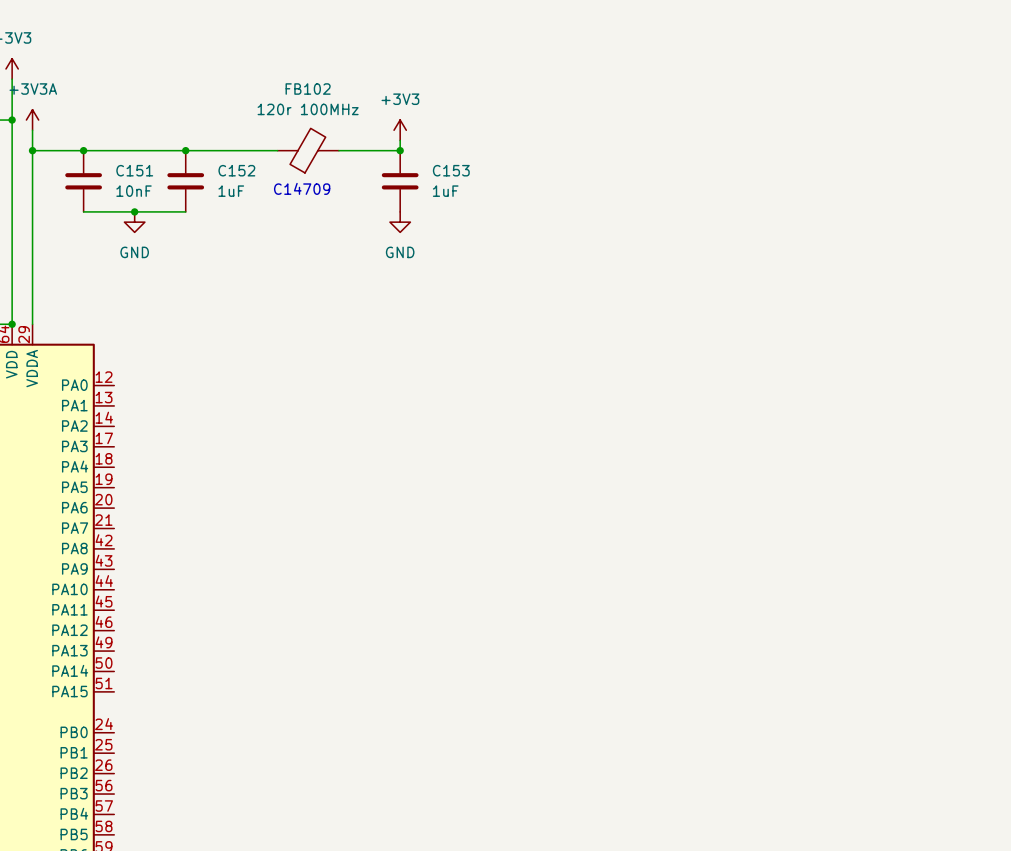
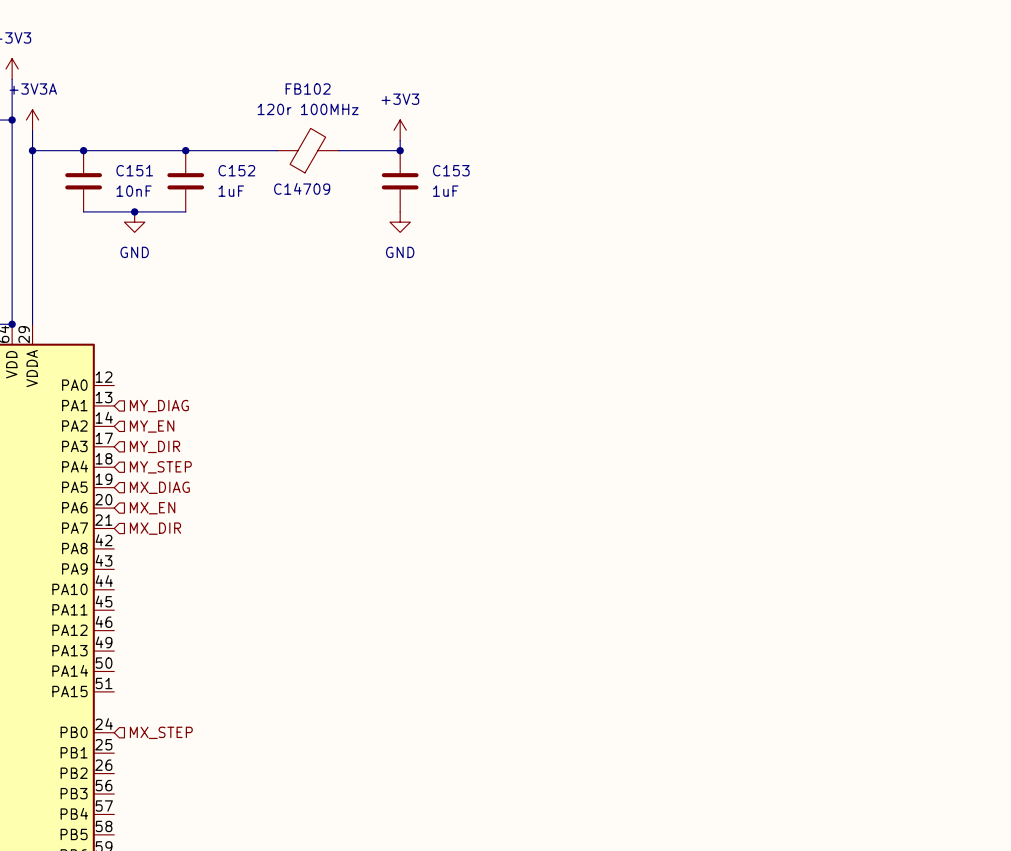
hierarchical label: none -> MY_DIAG (159, 406)
hierarchical label: none -> MY_EN (152, 426)
hierarchical label: none -> MY_DIR (155, 446)
hierarchical label: none -> MY_STEP (160, 467)
hierarchical label: none -> MX_DIAG (159, 487)
hierarchical label: none -> MX_EN (152, 508)
hierarchical label: none -> MX_DIR (155, 528)
hierarchical label: none -> MX_STEP (161, 732)

